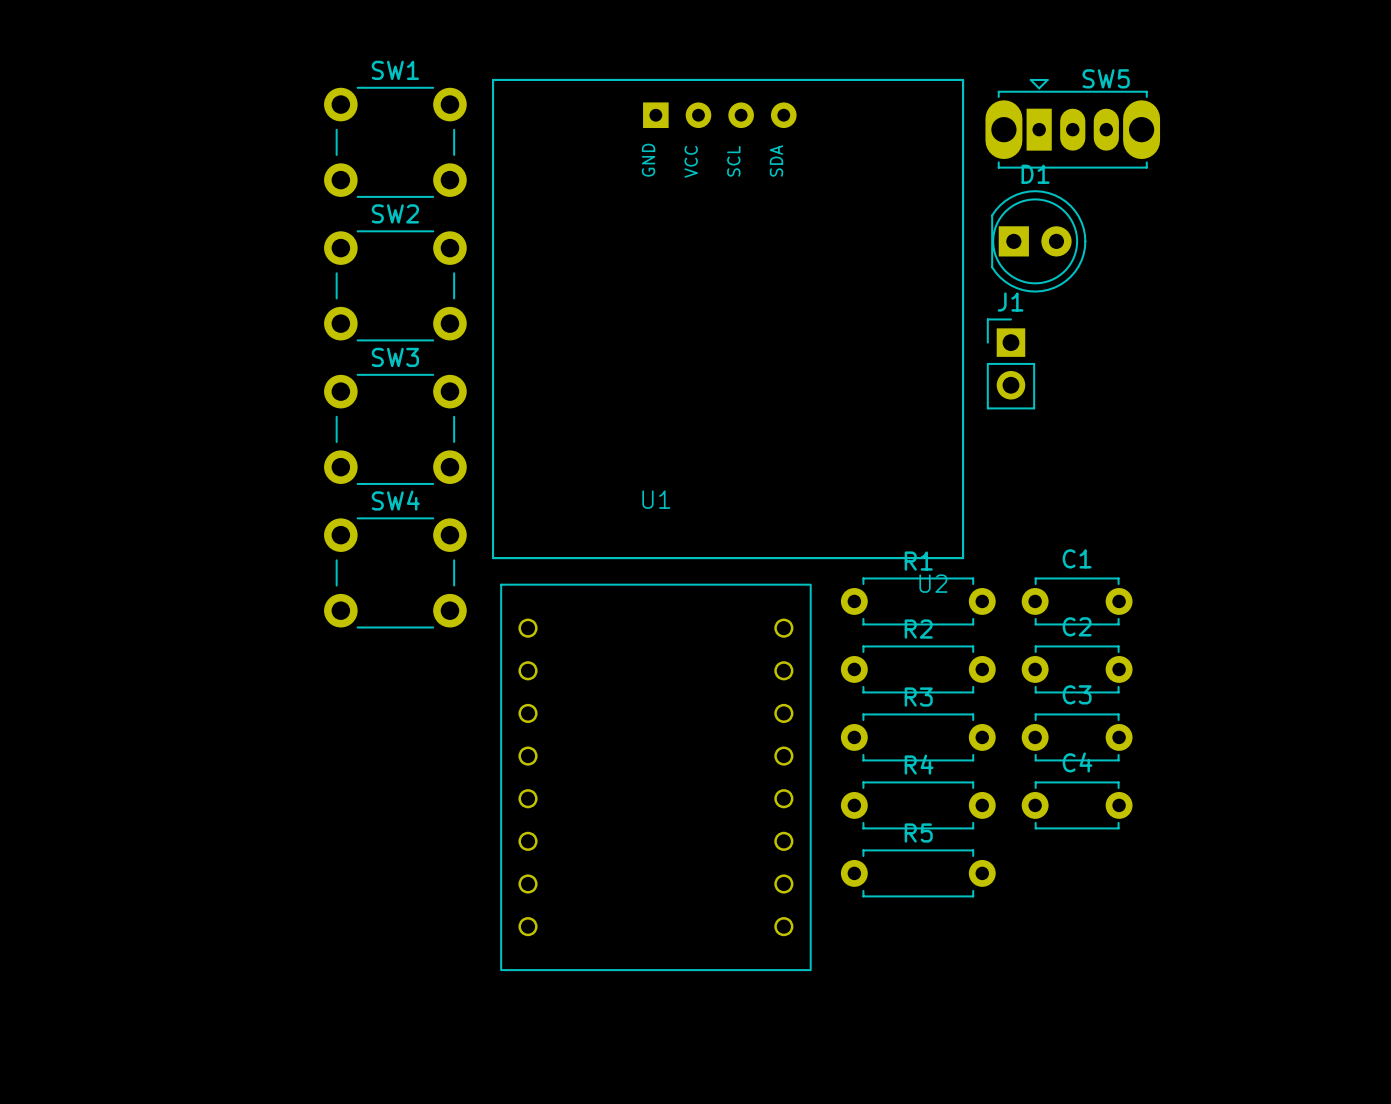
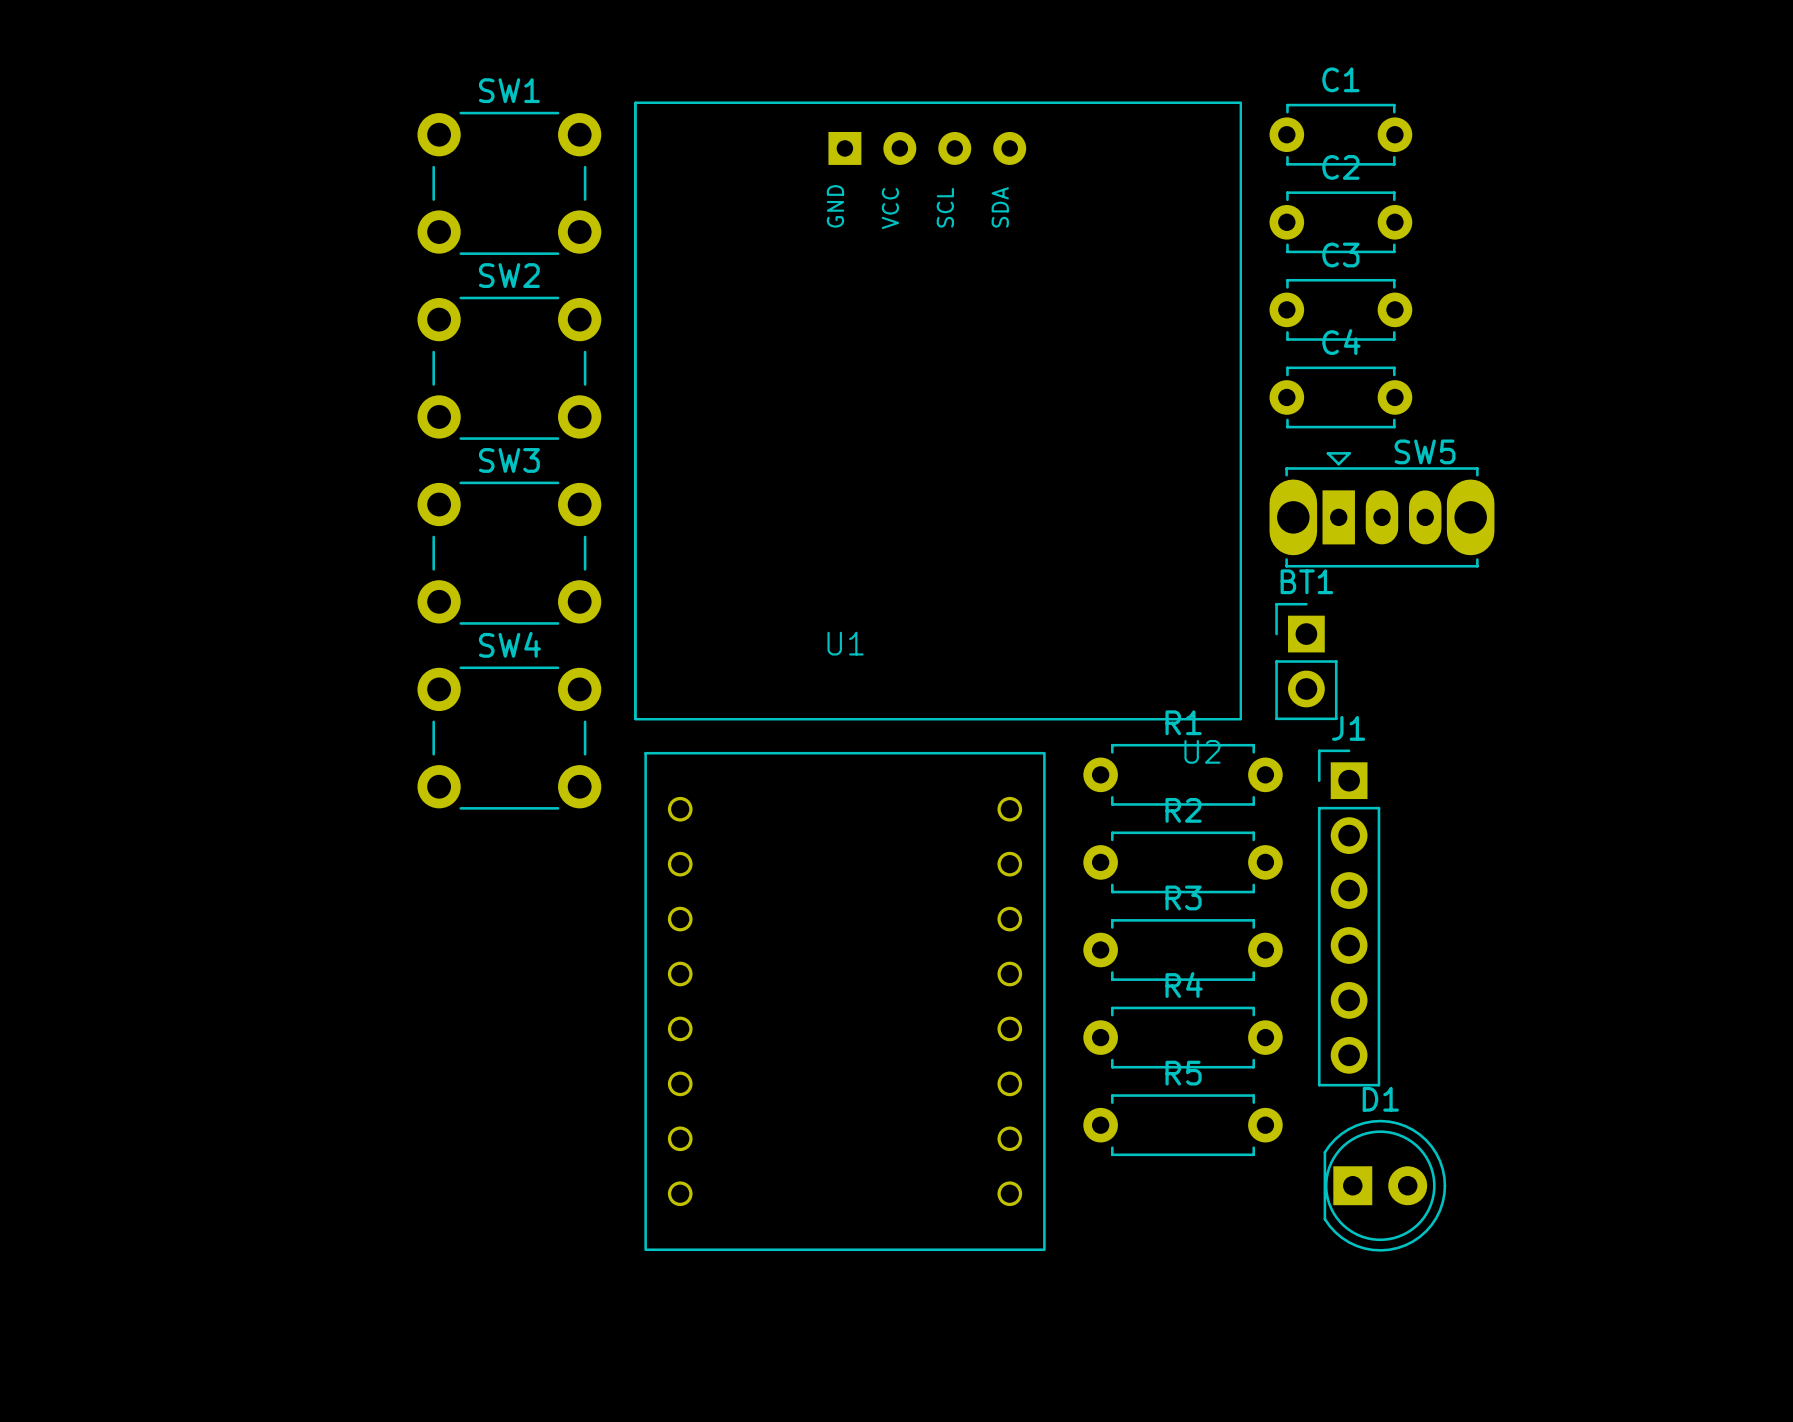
SW5 position: (1072, 123) -> (1381, 509)
D1 position: (1038, 241) -> (1384, 1185)
J1 name position: J1 (1010, 302) -> J1 (1348, 728)
J1 footprint: [986, 318, 1036, 410] -> [1317, 749, 1381, 1087]
BT1: none -> (1306, 661)
C1 position: (1077, 601) -> (1340, 134)
C2 position: (1077, 669) -> (1340, 222)
C3 position: (1077, 737) -> (1340, 309)
C4 position: (1077, 805) -> (1340, 397)

